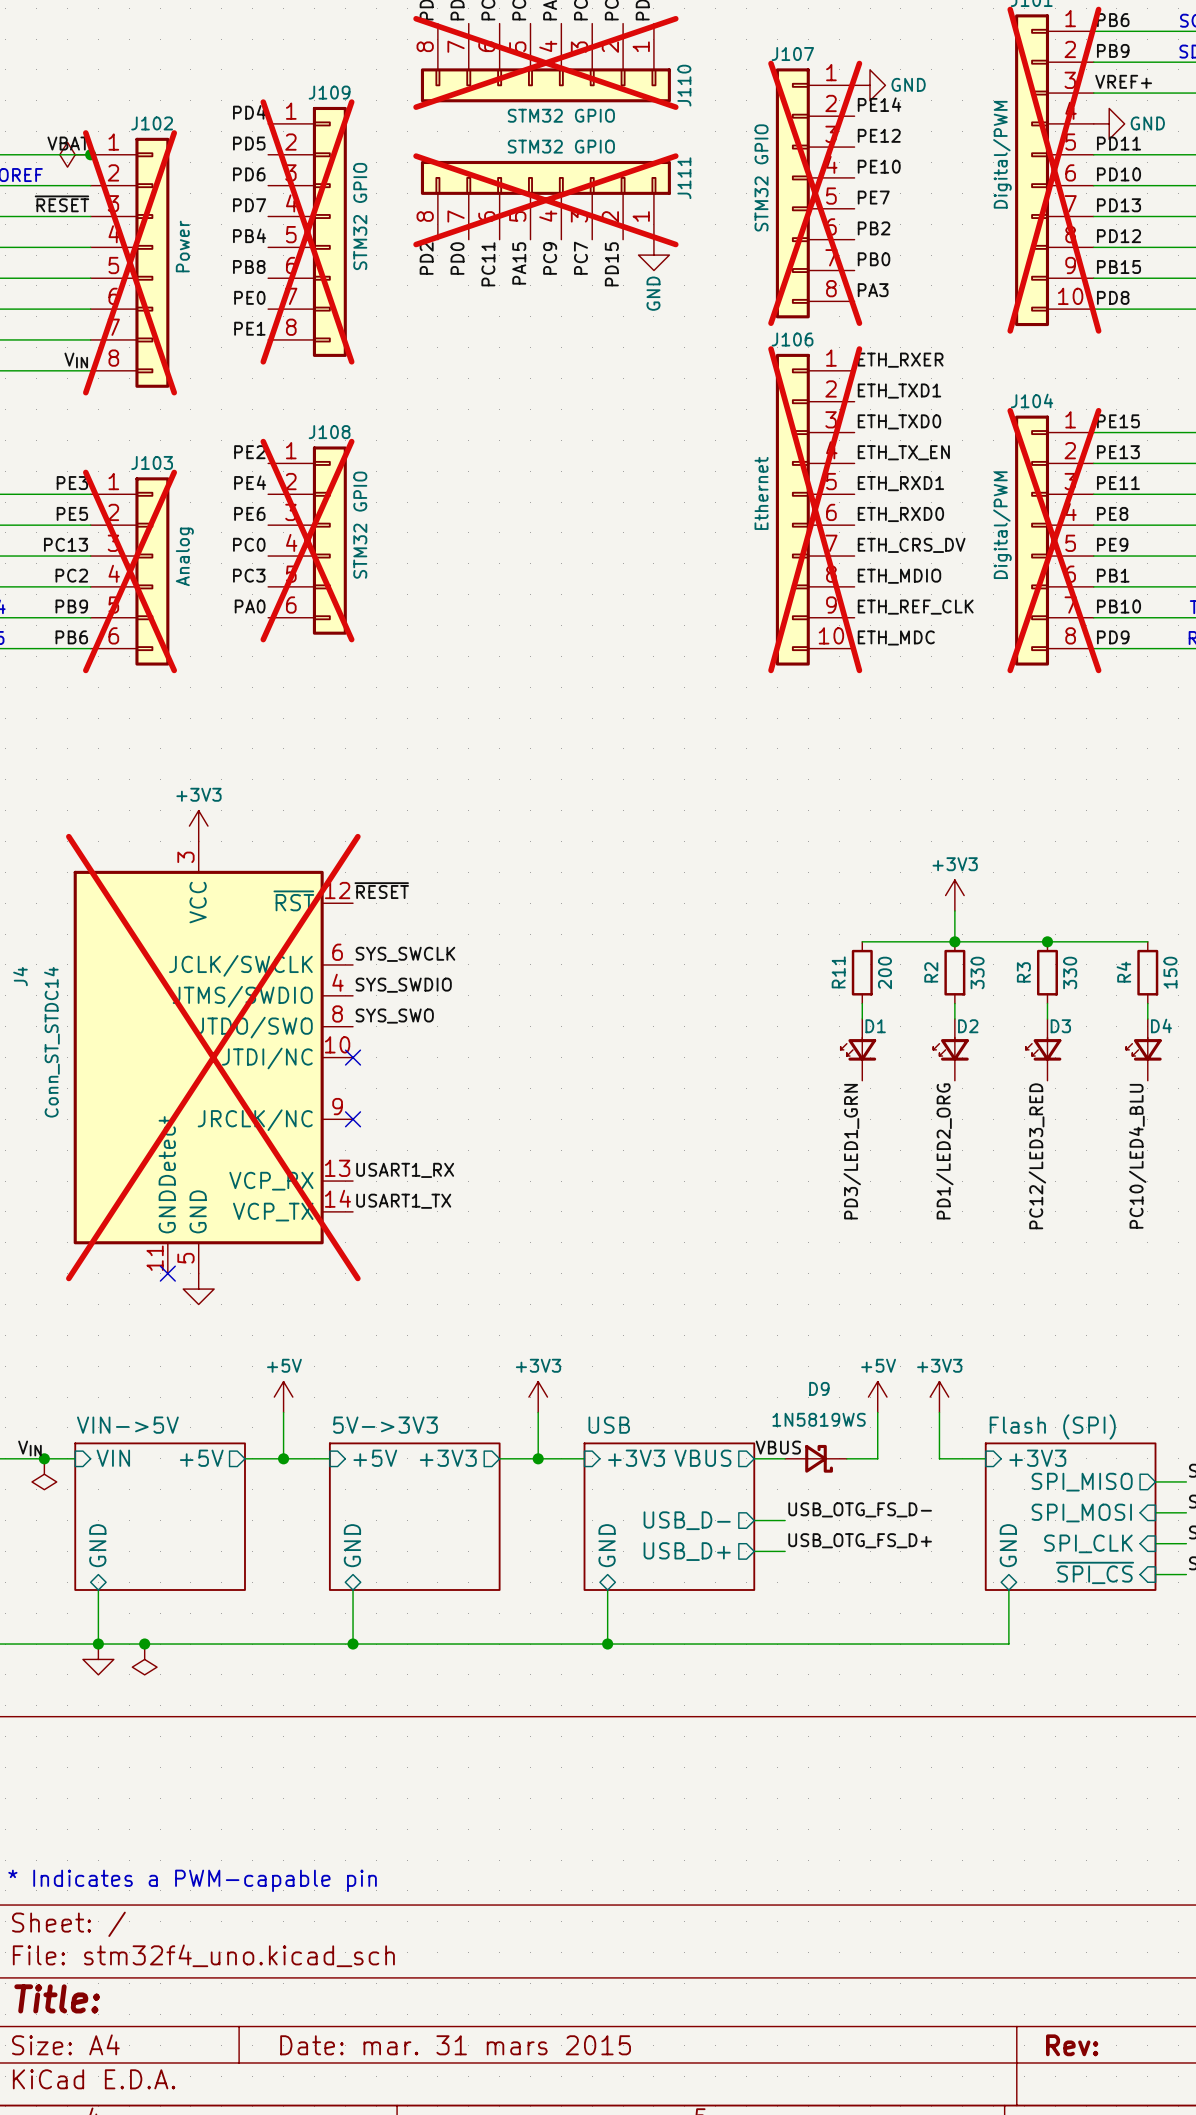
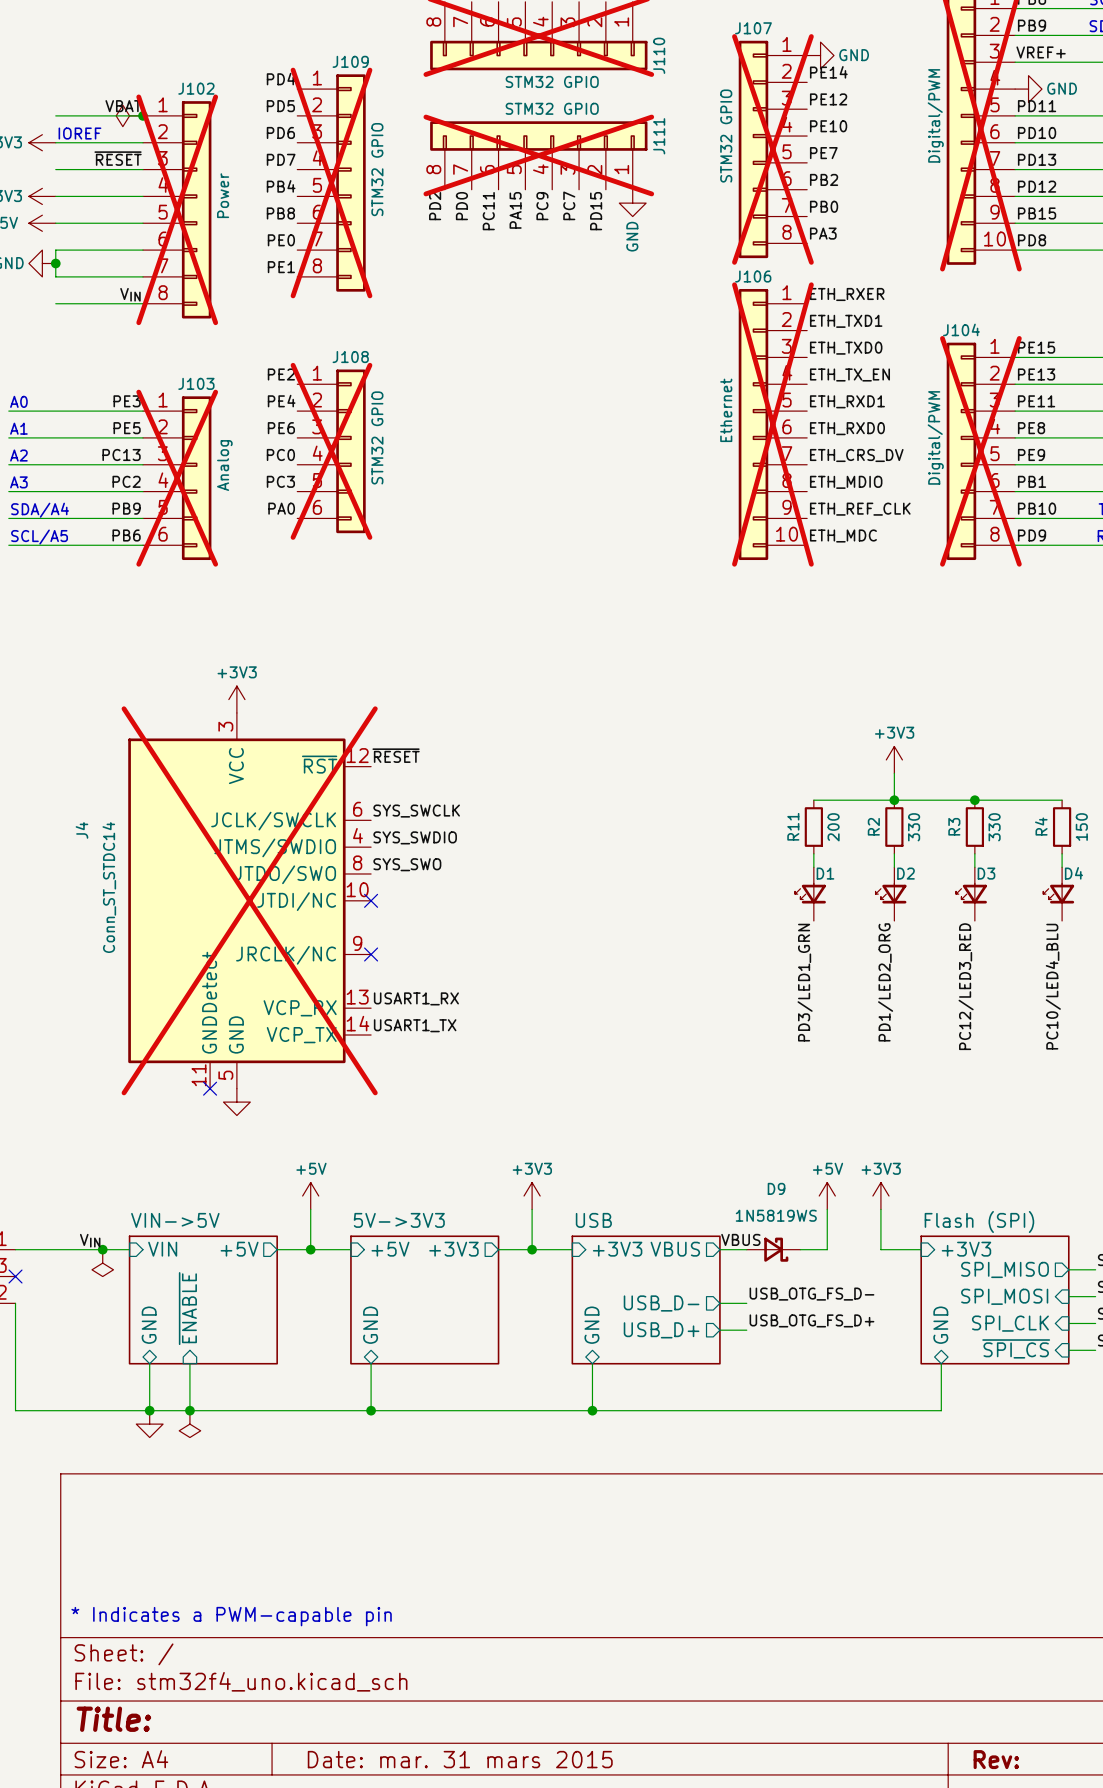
sheet pin: none -> ~{ENABLE} (187, 1308)
wire: none -> (189, 1363) (189, 1410)

